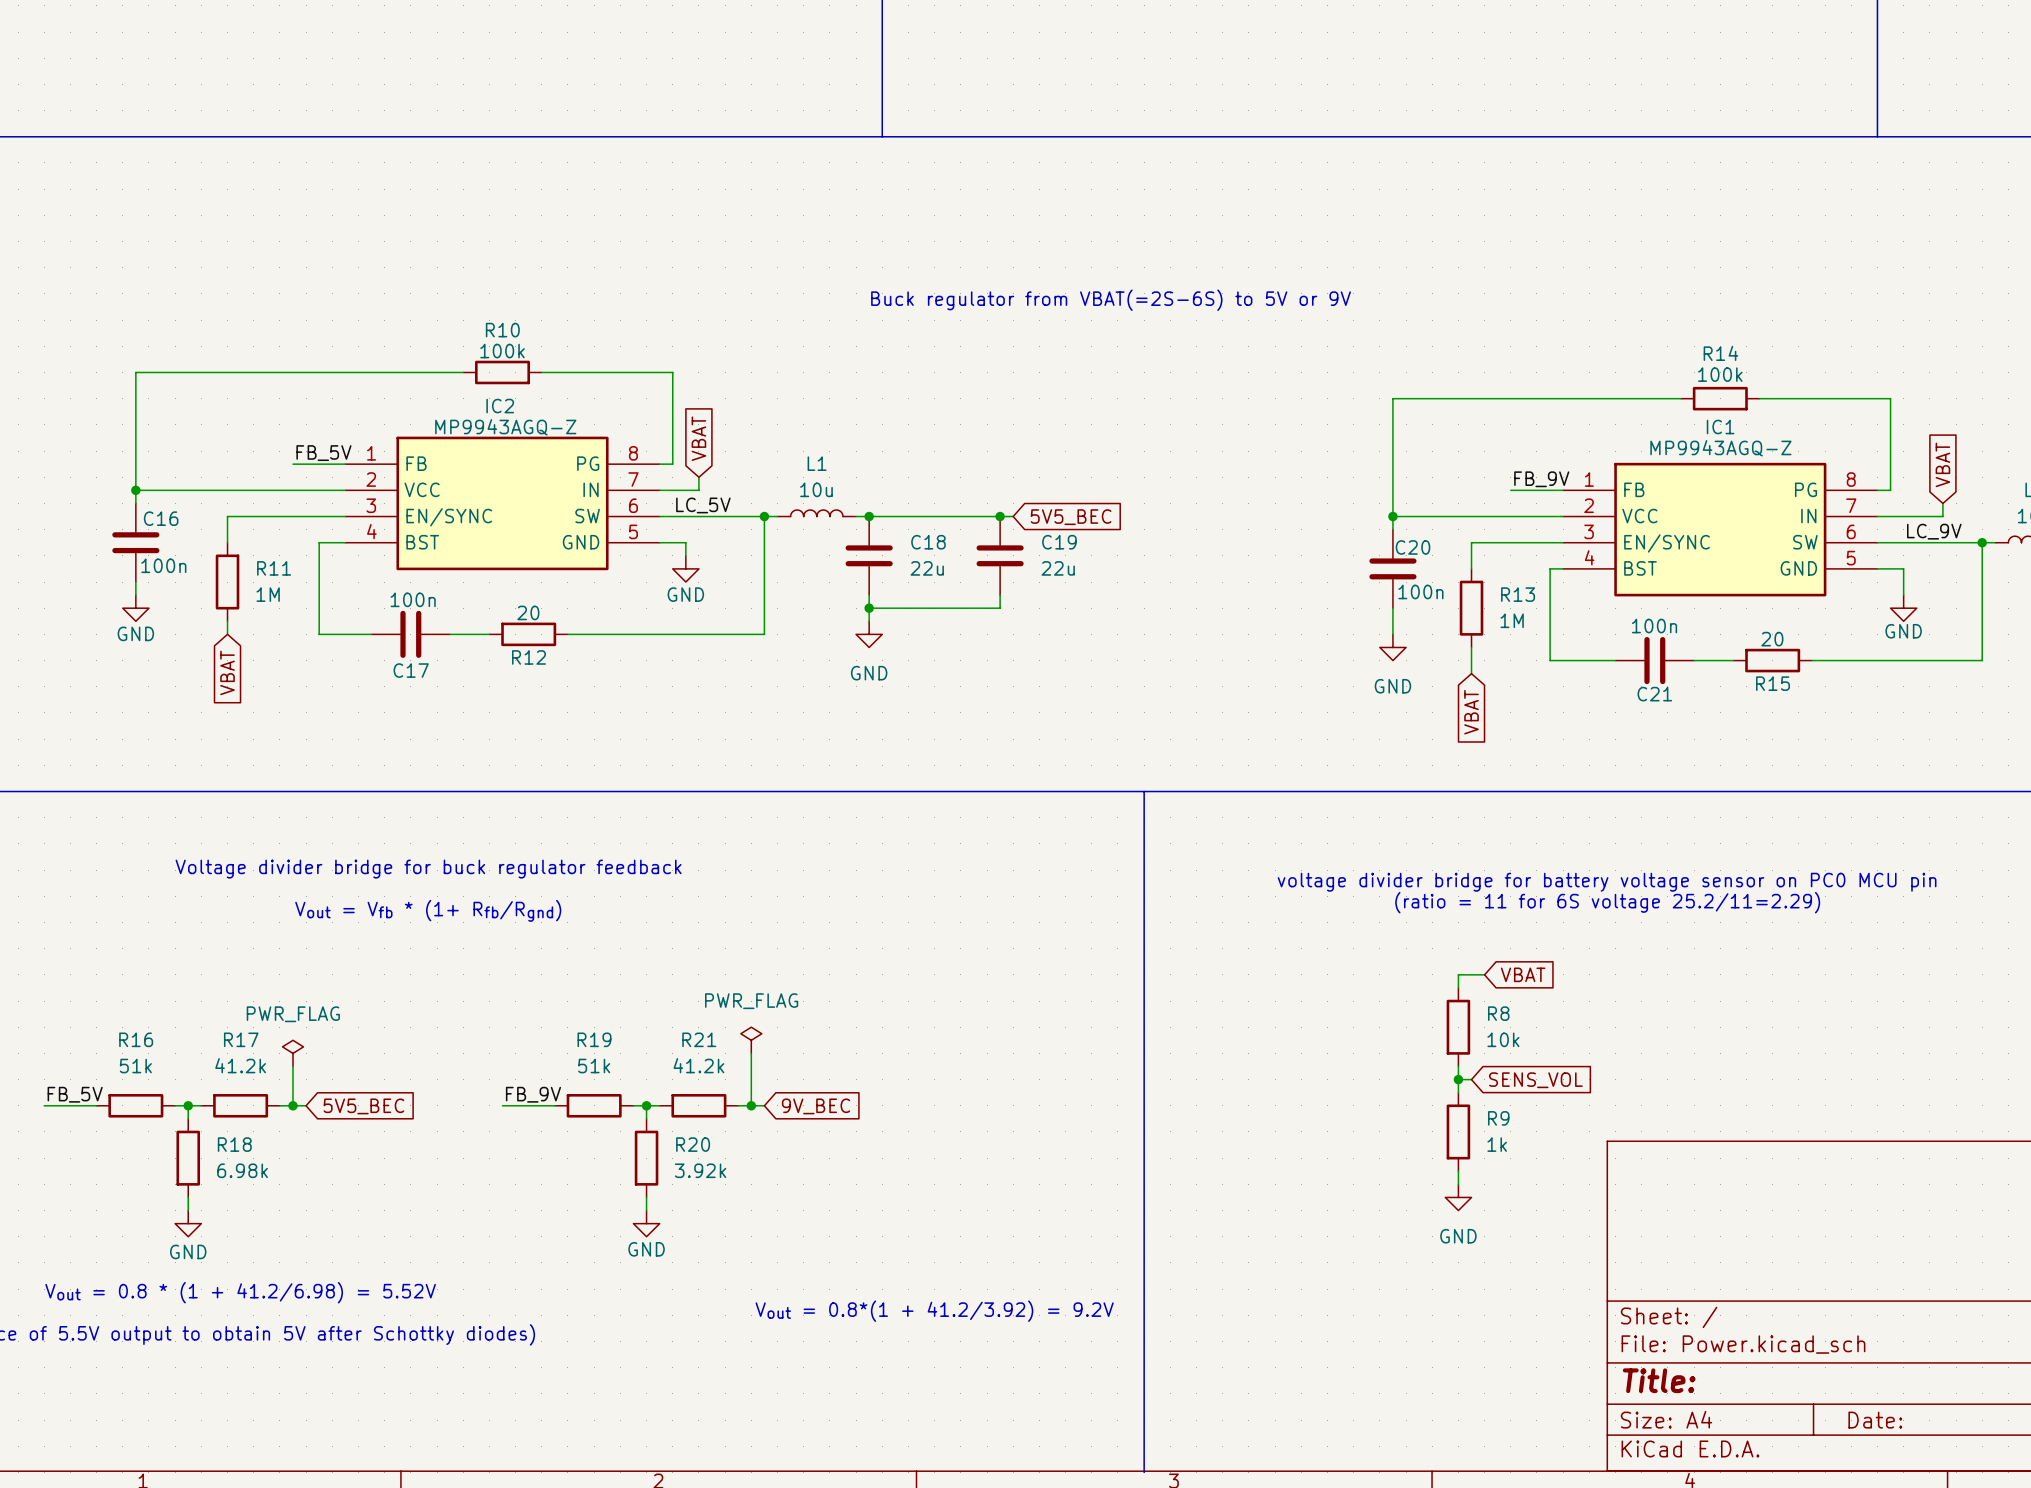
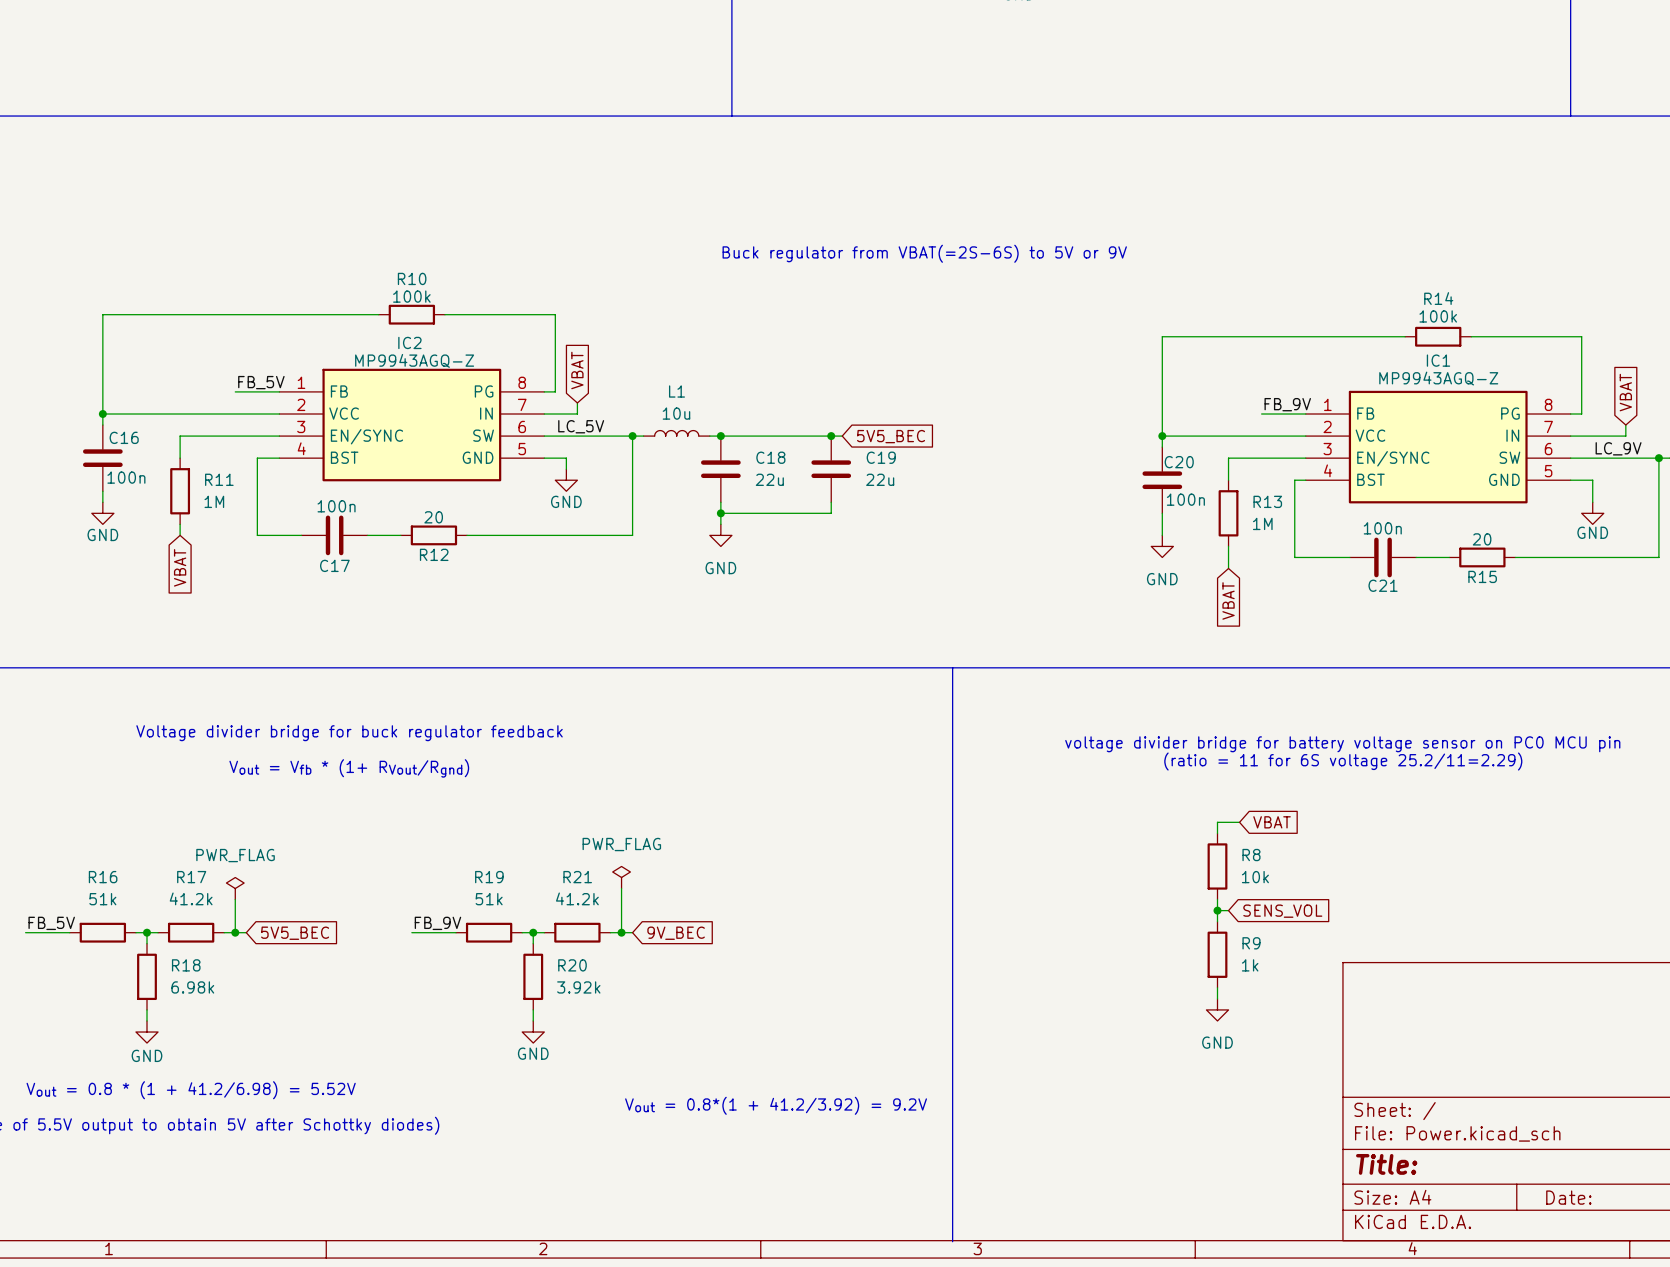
text: Vout = Vfb * (1+ Rfb/Rgnd) (428, 910) -> Vout = Vfb * (1+ RVout/Rgnd) (349, 768)

